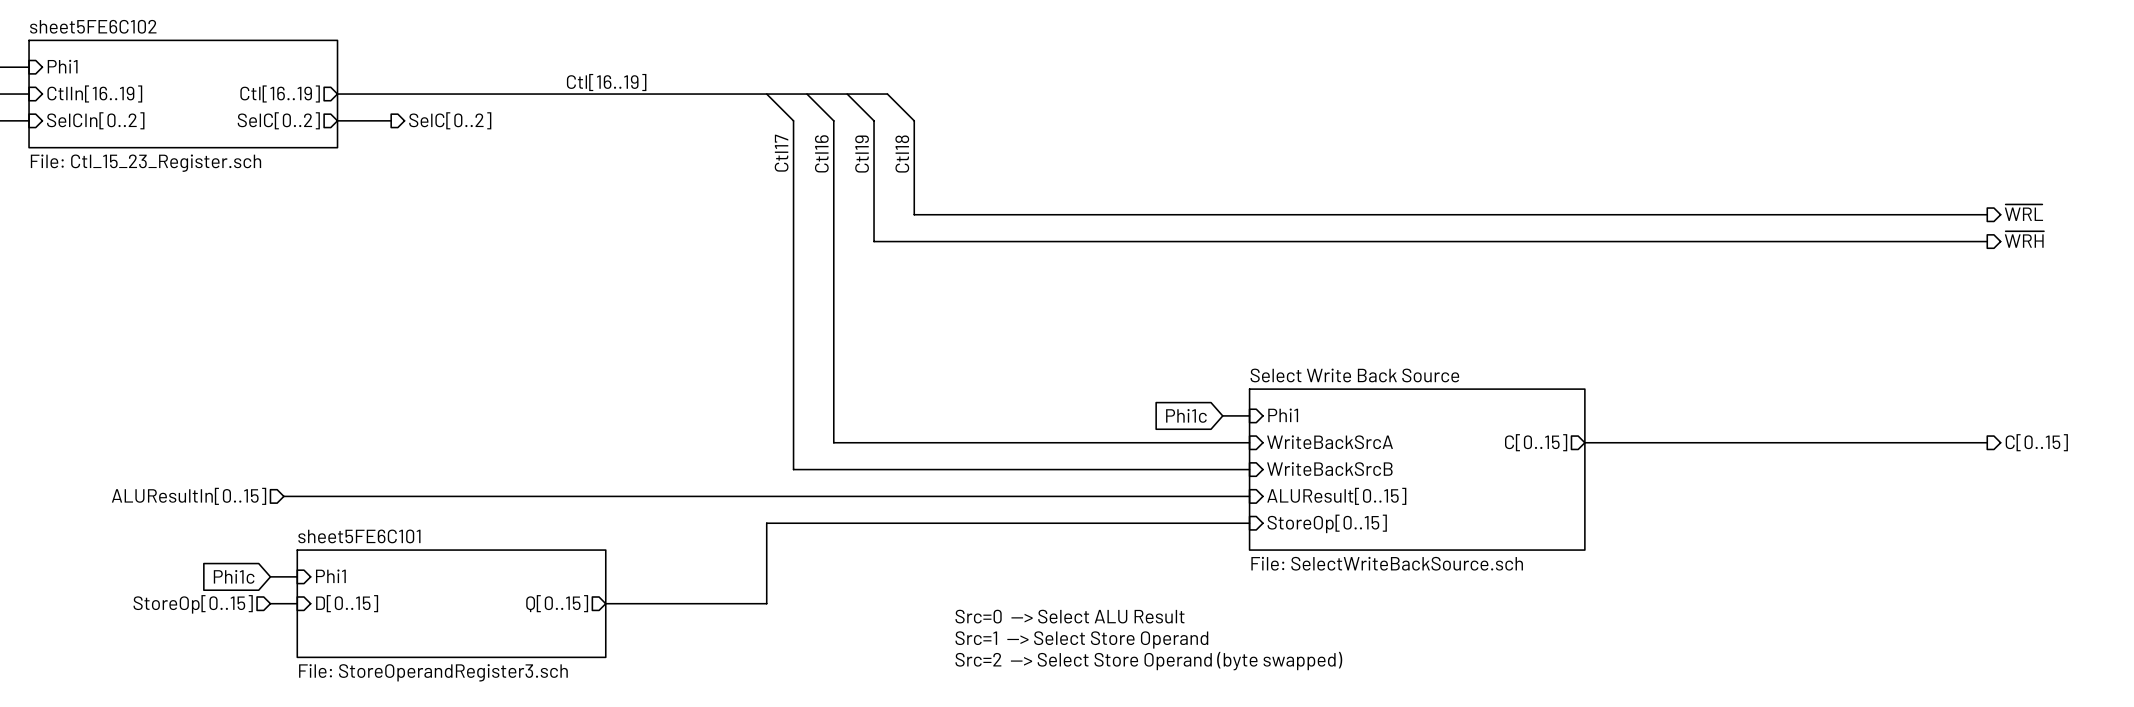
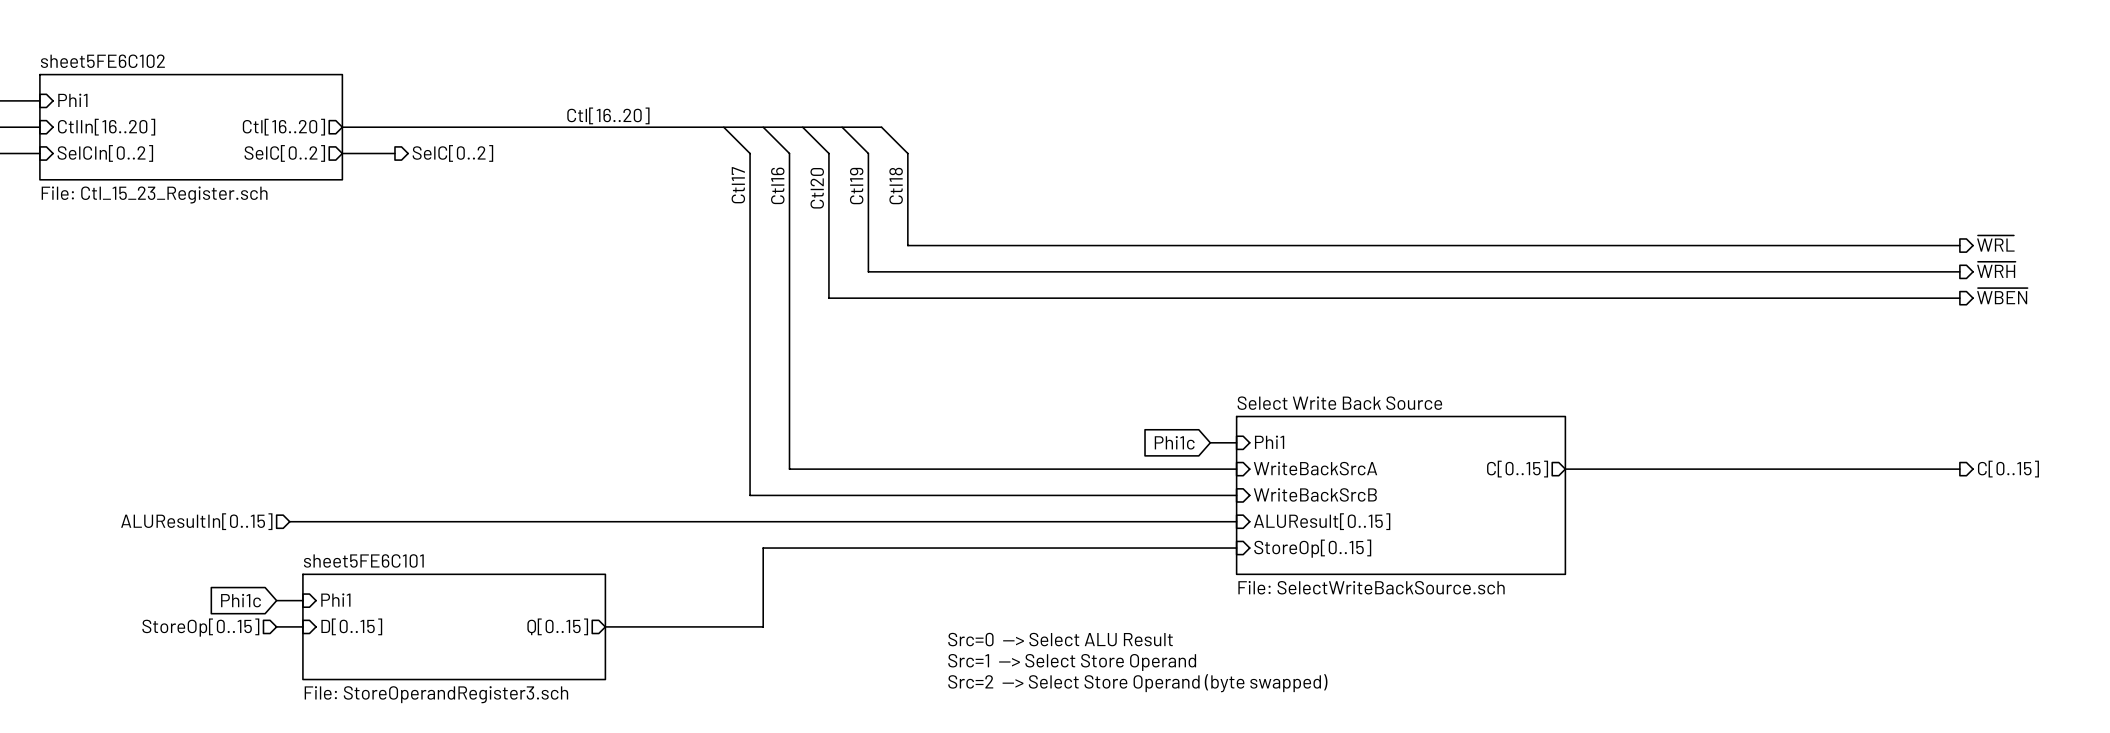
label: Ctl[16..19] (606, 82) -> Ctl[16..20] (608, 115)
sheet pin: CtlIn[16..19] (94, 93) -> CtlIn[16..20] (106, 127)
sheet pin: Ctl[16..19] (280, 93) -> Ctl[16..20] (283, 127)
wire: none -> (723, 127) (750, 153) (750, 495) (789, 495)
label: none -> Ctl17 (738, 185)
label: Ctl17 (781, 153) -> Ctl16 (777, 185)
label: Ctl16 (821, 153) -> Ctl20 (817, 188)
hierarchical label: none -> ~{WBEN} (2002, 296)
wire: (833, 268) (833, 442) -> (828, 298) (1959, 298)
wire: (793, 442) (793, 469) -> (789, 469) (828, 469)

